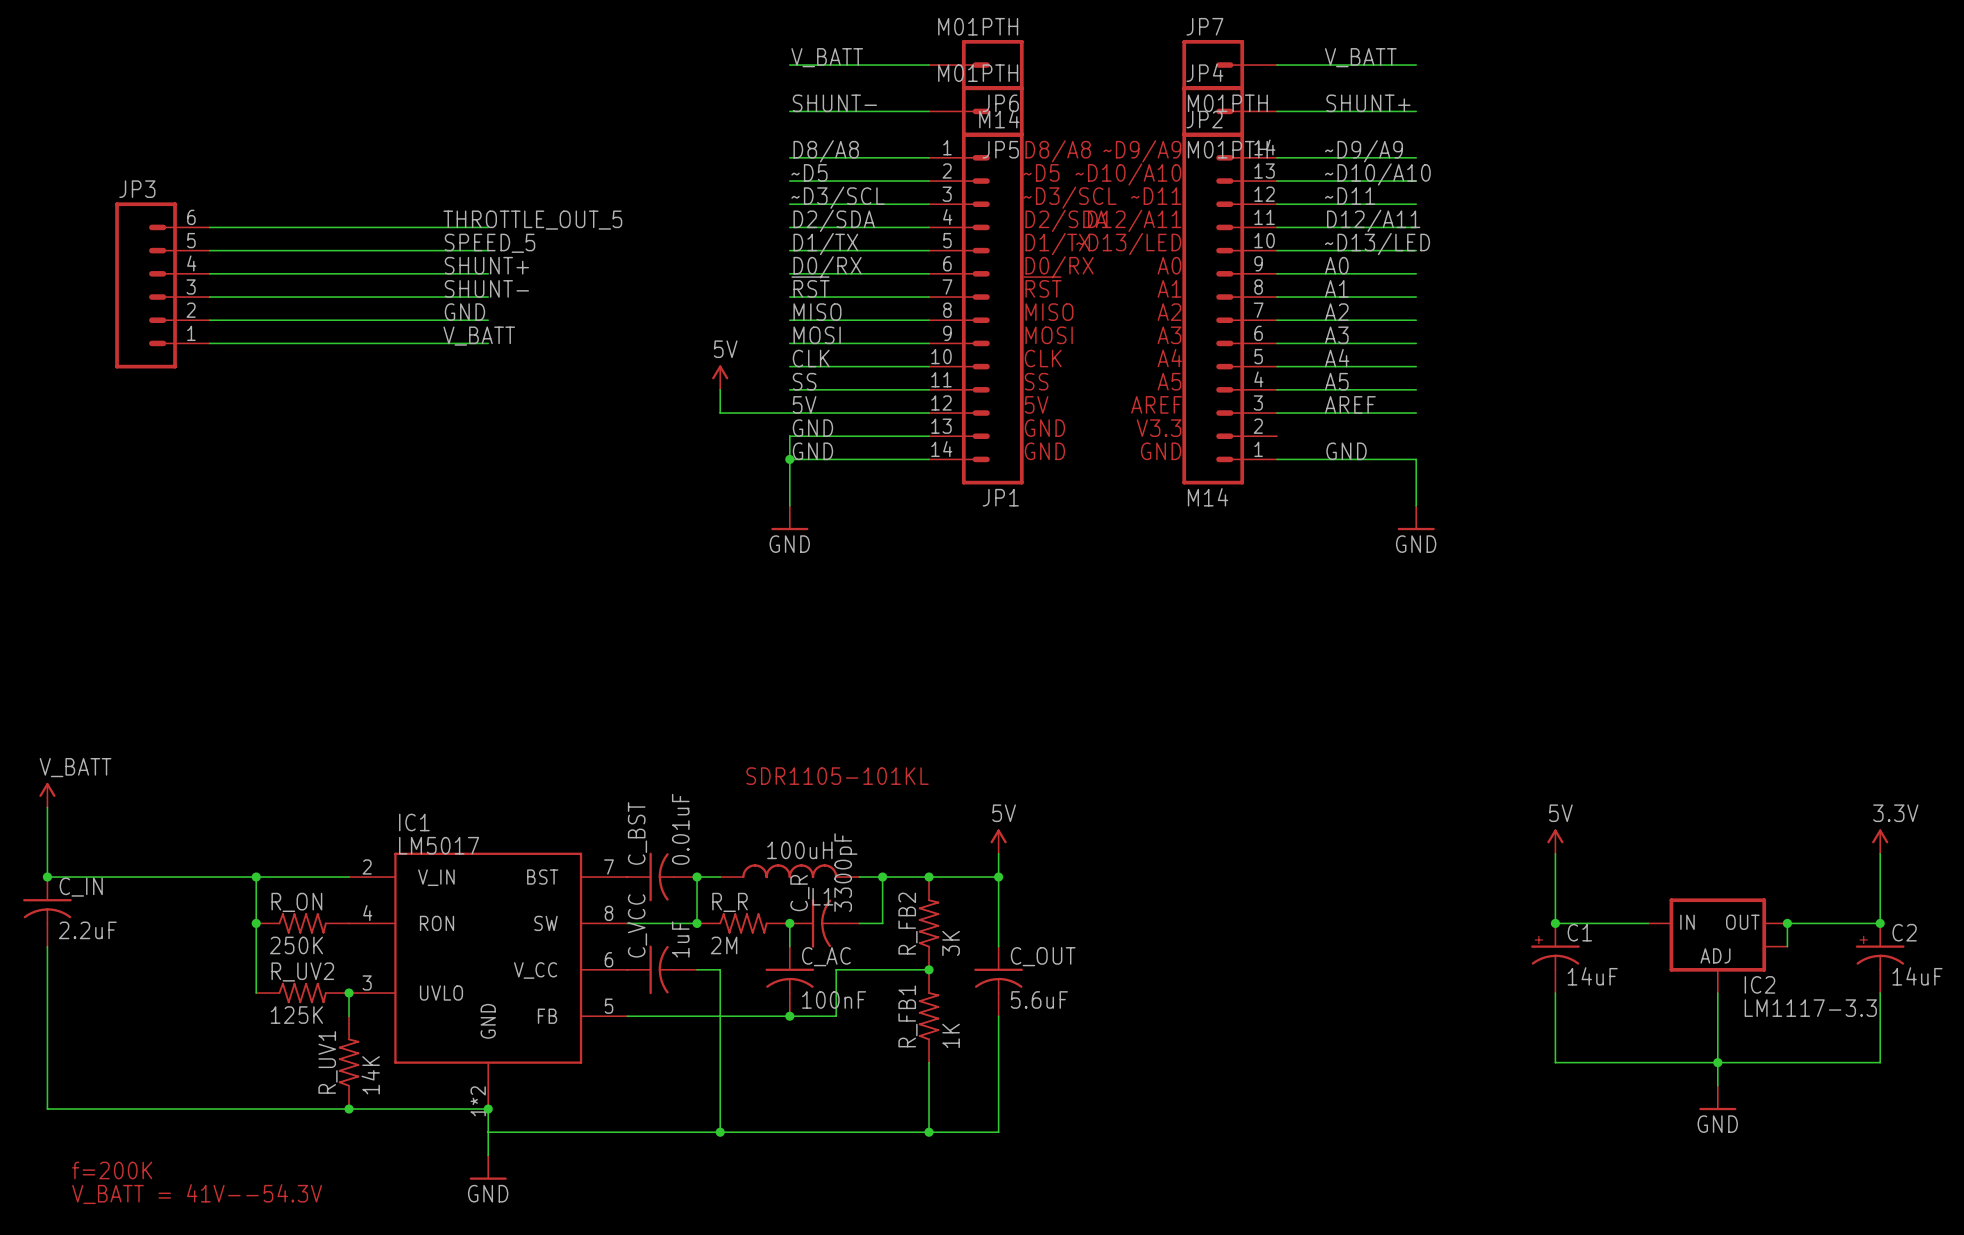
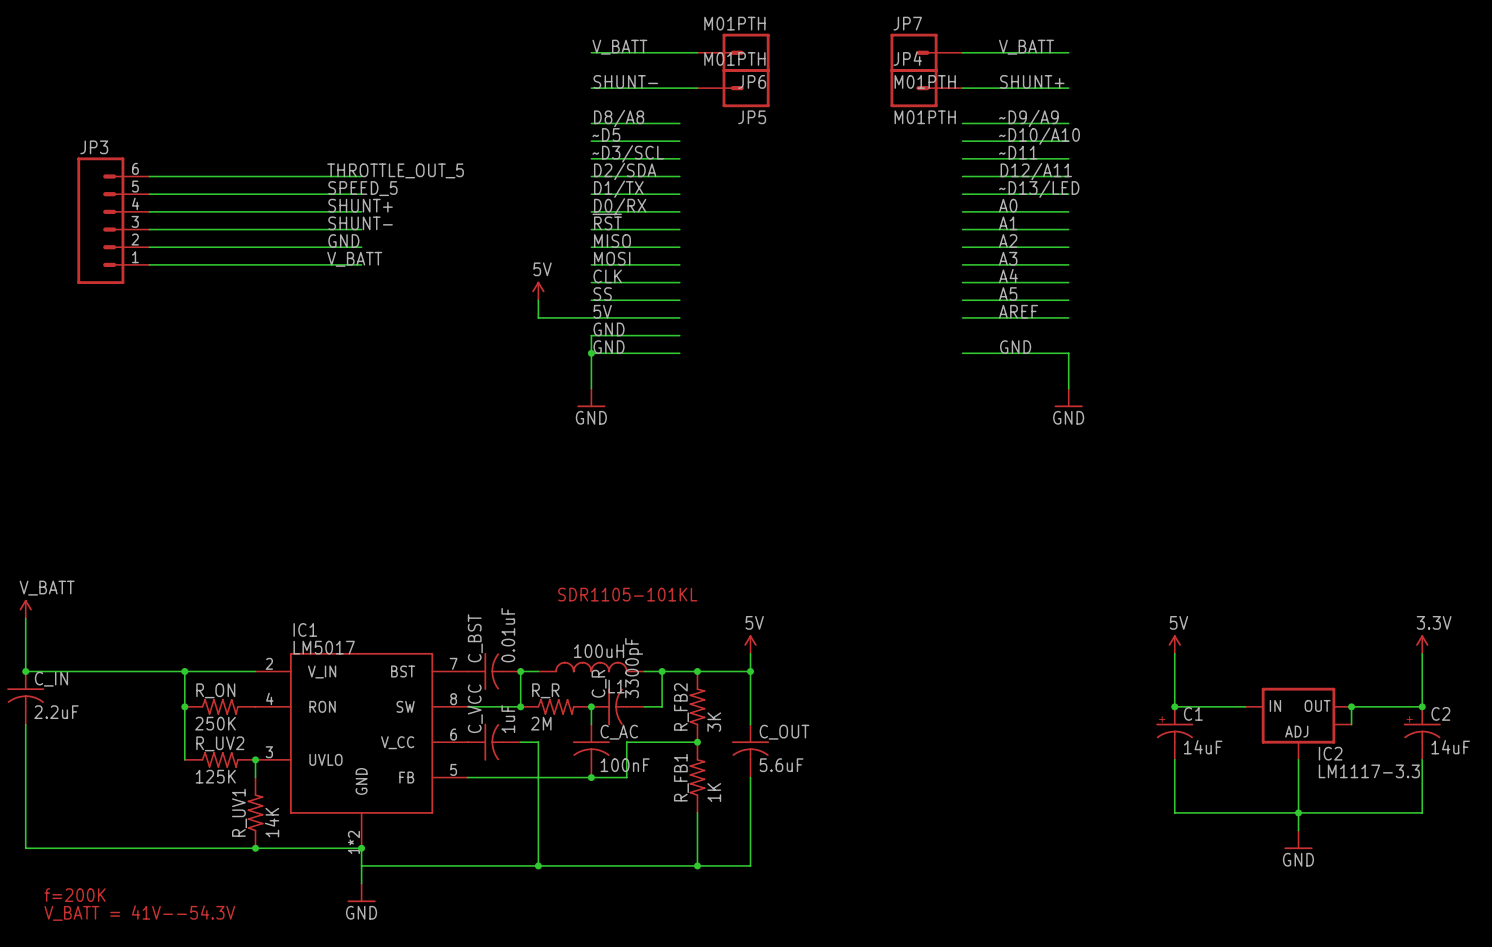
text: D8/A8 (1058, 151) -> none
text: ~D9/A9 (1142, 151) -> none
wire: (905, 157) (929, 157) -> none
text: ~D5 (1041, 172) -> none
text: ~D10/A10 (1128, 174) -> none
wire: (905, 181) (929, 181) -> none
text: ~D11 (1156, 196) -> none
text: ~D3/SCL (1070, 197) -> none
wire: (905, 204) (929, 204) -> none
text: D2/SDA (1066, 220) -> none
text: D12/A11 (1134, 220) -> none
wire: (905, 227) (929, 227) -> none
text: D1/TX (1057, 244) -> none
text: ~D13/LED (1128, 244) -> none
wire: (905, 250) (929, 250) -> none
text: A0 (1169, 265) -> none
text: D0/RX (1059, 267) -> none
wire: (905, 273) (929, 273) -> none
text: ~{RST} (1042, 287) -> none
text: A1 (1169, 288) -> none
wire: (905, 297) (929, 297) -> none
JP1: M14 (976, 308) -> none
JP2: M14 (1229, 308) -> none
text: MISO (1049, 312) -> none
text: A2 (1169, 312) -> none
wire: (905, 320) (929, 320) -> none
text: MOSI (1049, 335) -> none
text: A3 (1169, 335) -> none
wire: (905, 343) (929, 343) -> none
text: CLK (1043, 358) -> none
text: A4 (1169, 358) -> none
wire: (905, 366) (929, 366) -> none
text: SS (1036, 381) -> none
text: A5 (1169, 381) -> none
wire: (905, 389) (929, 389) -> none
text: 5V (1036, 404) -> none
text: AREF (1156, 404) -> none
wire: (905, 413) (929, 413) -> none
text: GND (1044, 428) -> none
text: V3.3 (1159, 428) -> none
wire: (905, 436) (929, 436) -> none
text: GND (1044, 451) -> none
text: GND (1161, 451) -> none
wire: (905, 459) (929, 459) -> none

